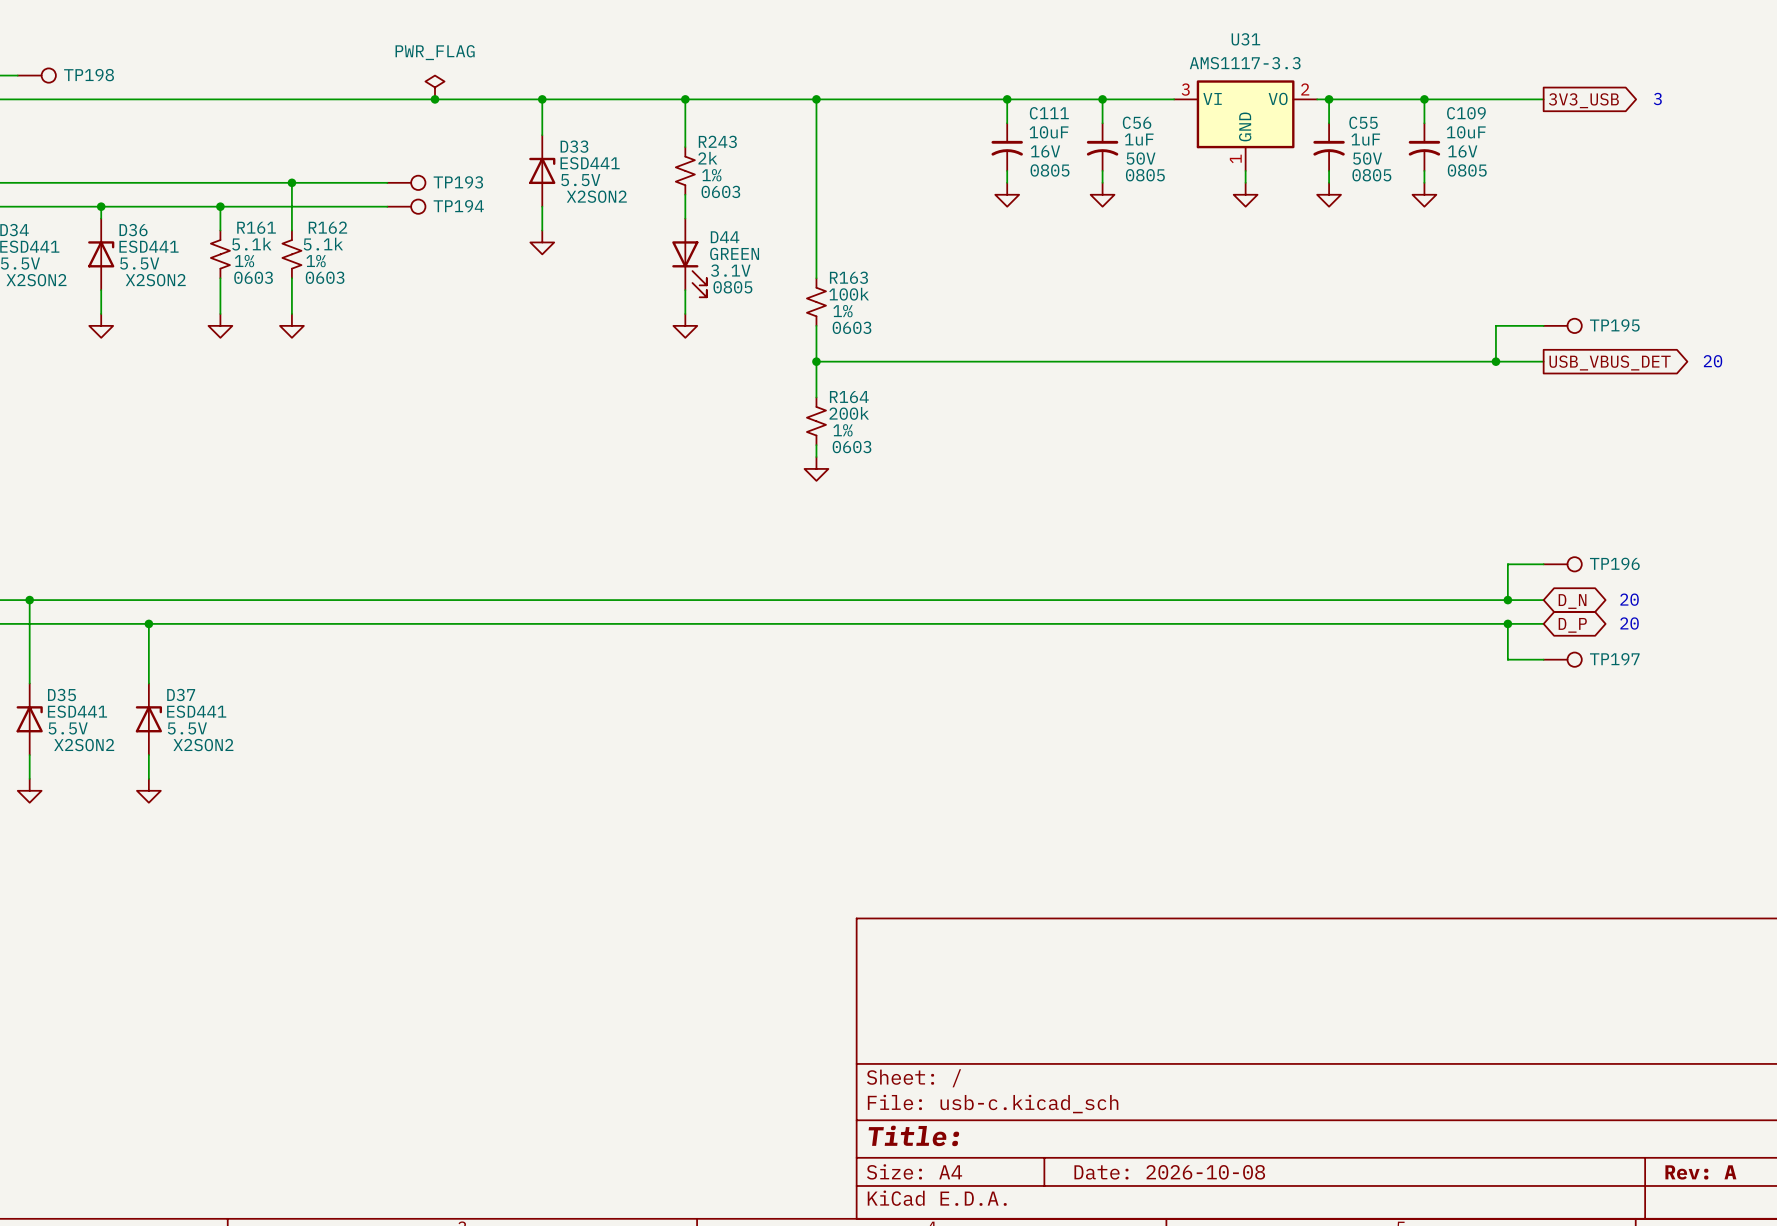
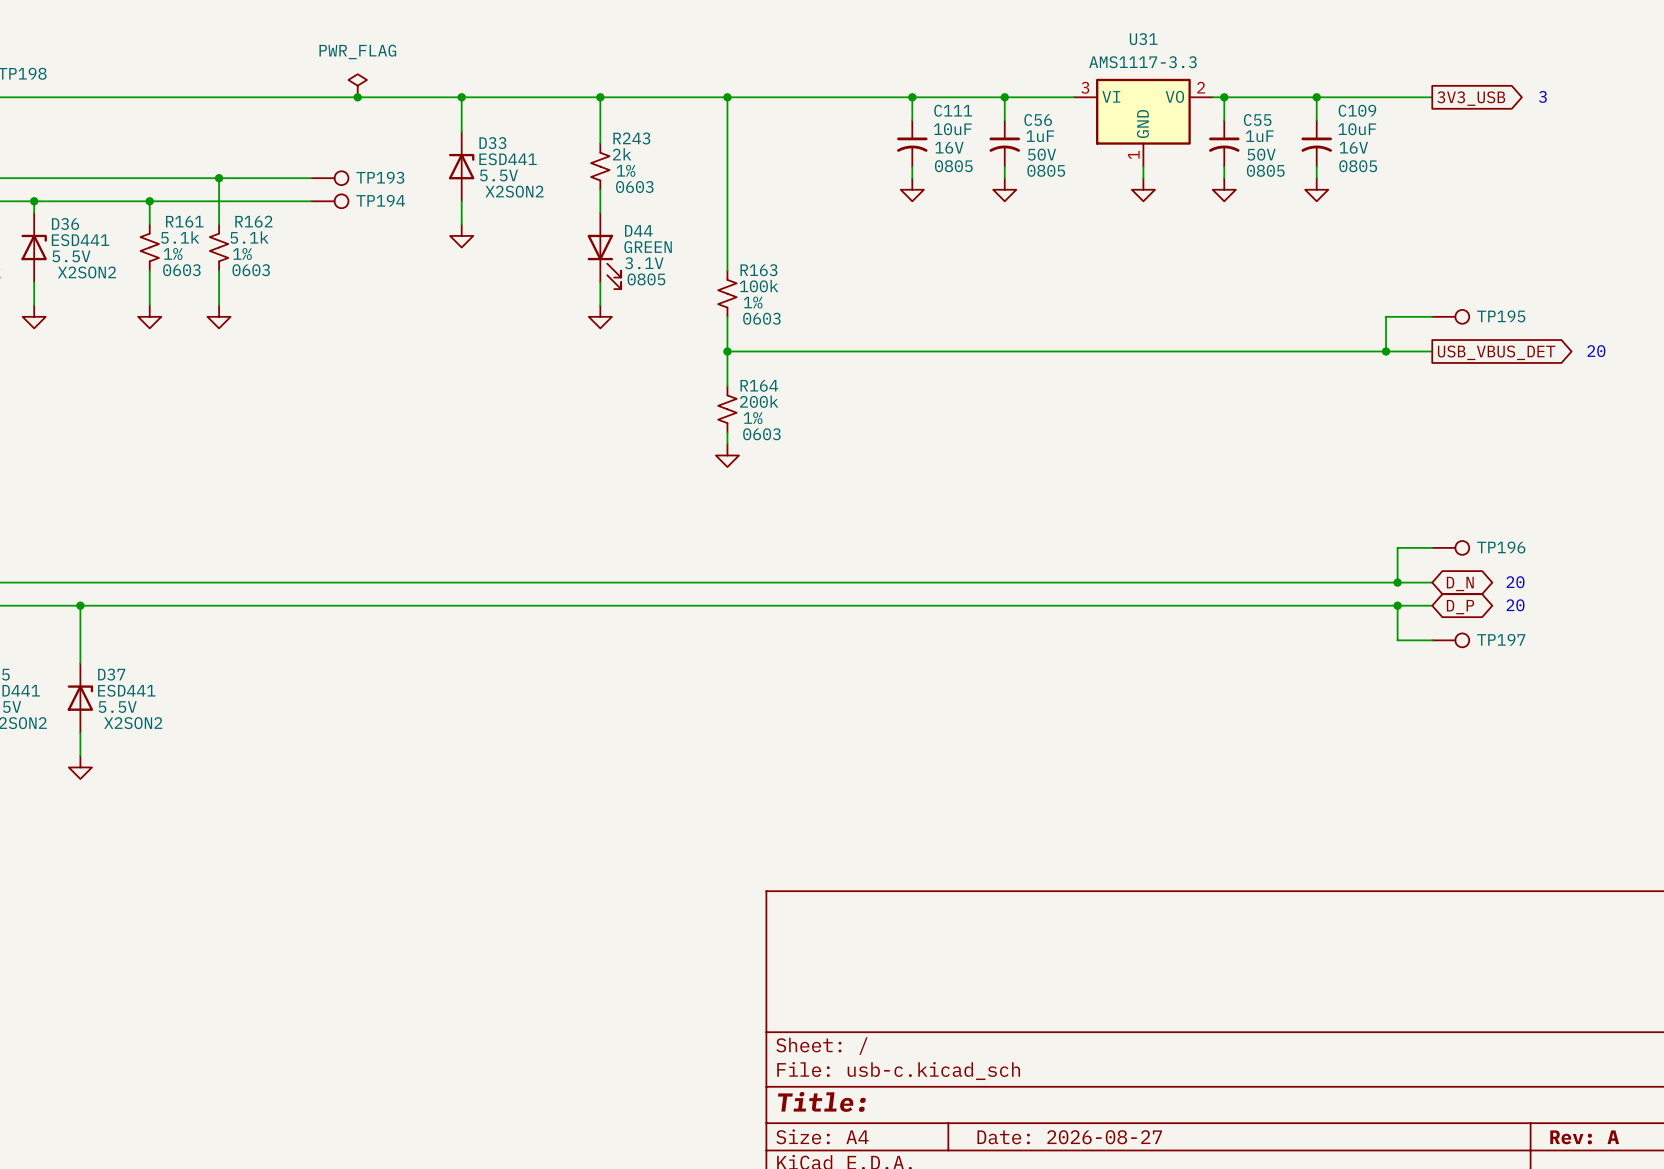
title block: Date: 2026-10-08 (1169, 1172) -> Date: 2026-08-27 (1069, 1137)

